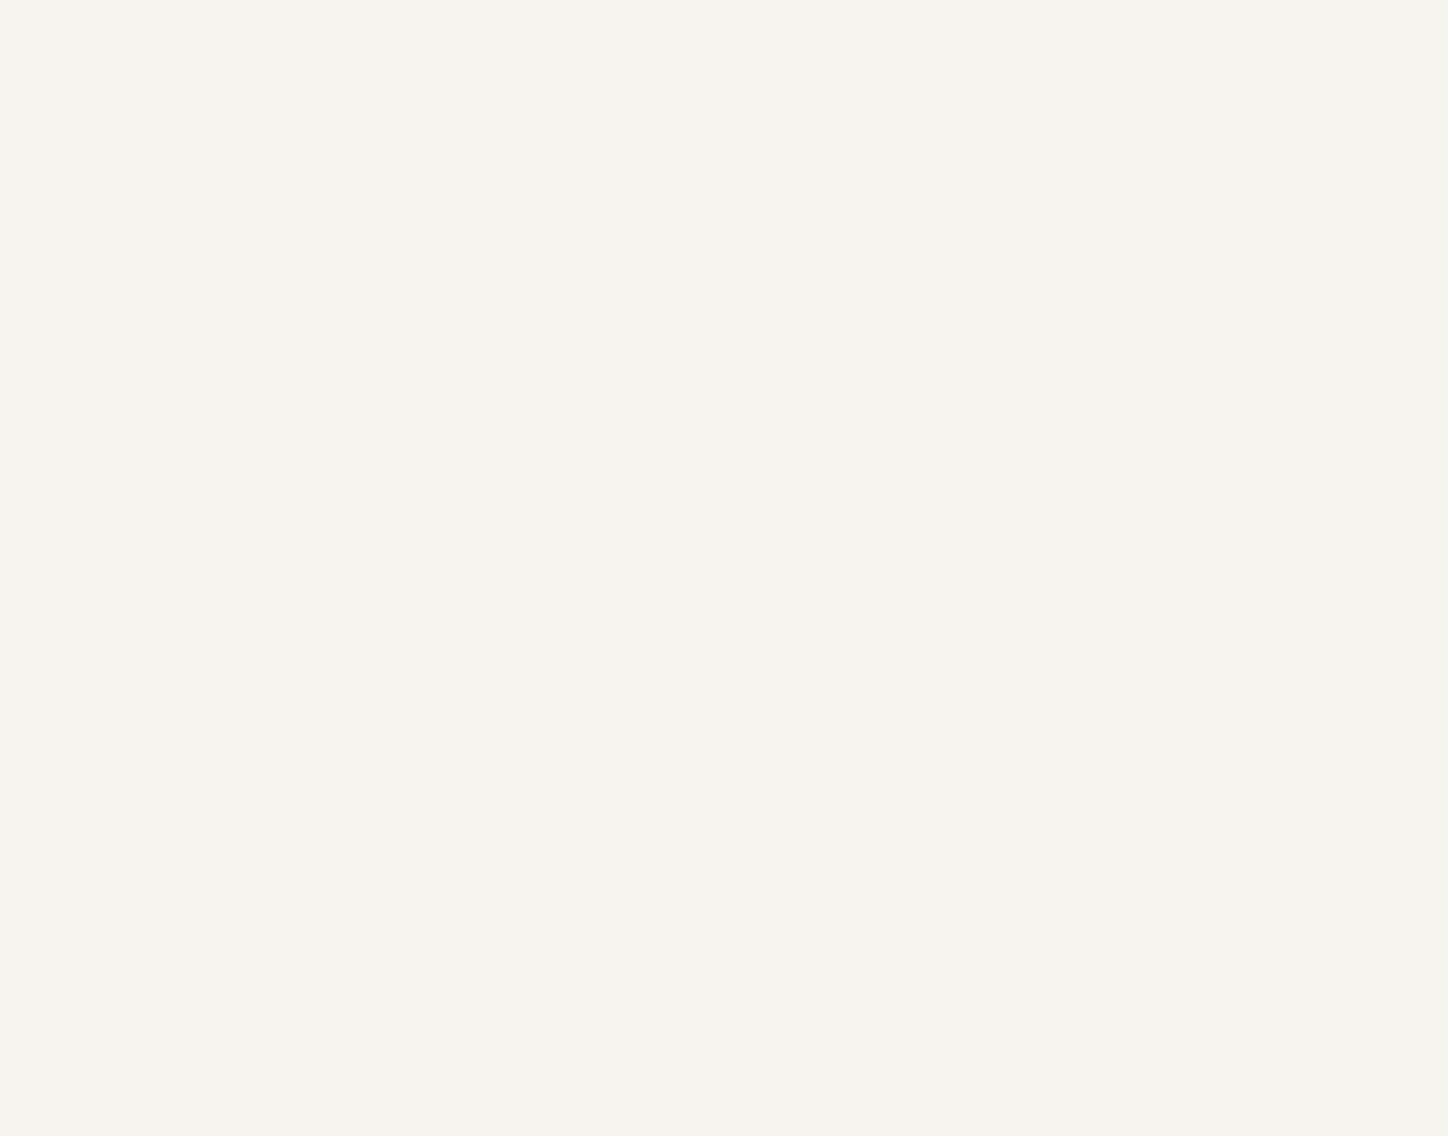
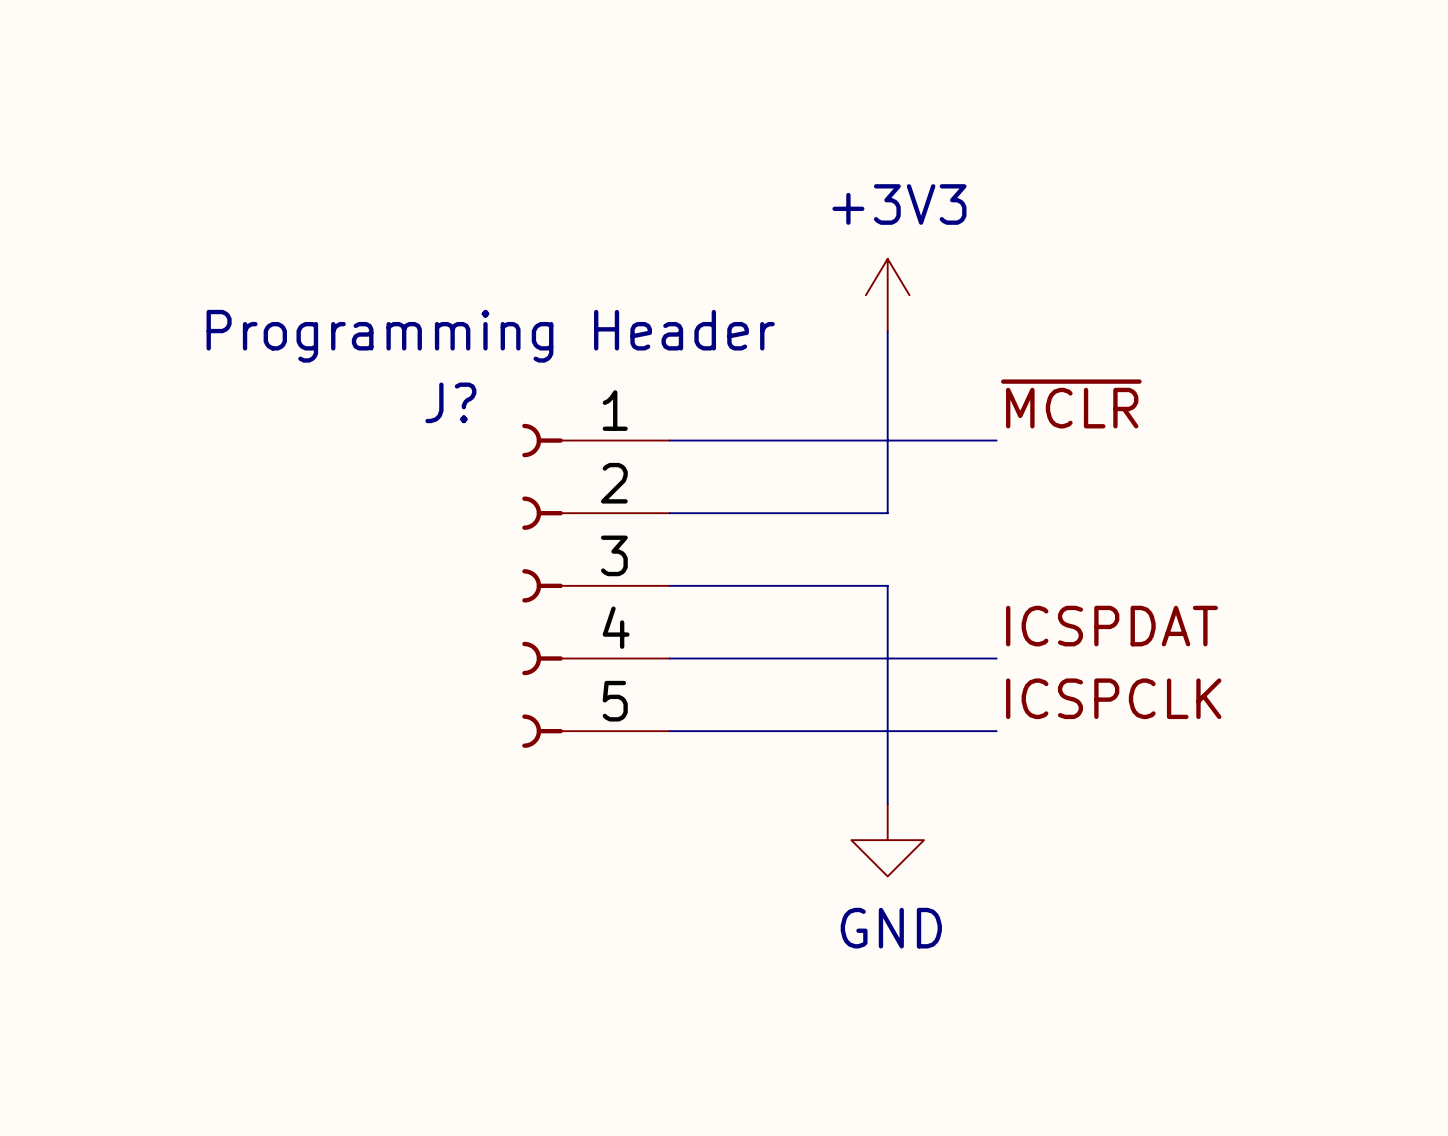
power symbol: none -> +3V3 (887, 295)
wire: none -> (887, 331) (887, 513) (669, 513)
label: none -> ~{MCLR} (1071, 403)
wire: none -> (669, 440) (996, 440)
J?: none -> Programming Header (595, 585)
wire: none -> (669, 585) (887, 585) (887, 803)
label: none -> ICSPDAT (1111, 626)
wire: none -> (669, 658) (996, 658)
label: none -> ICSPCLK (1113, 698)
wire: none -> (669, 731) (996, 731)
power symbol: none -> GND (887, 840)

